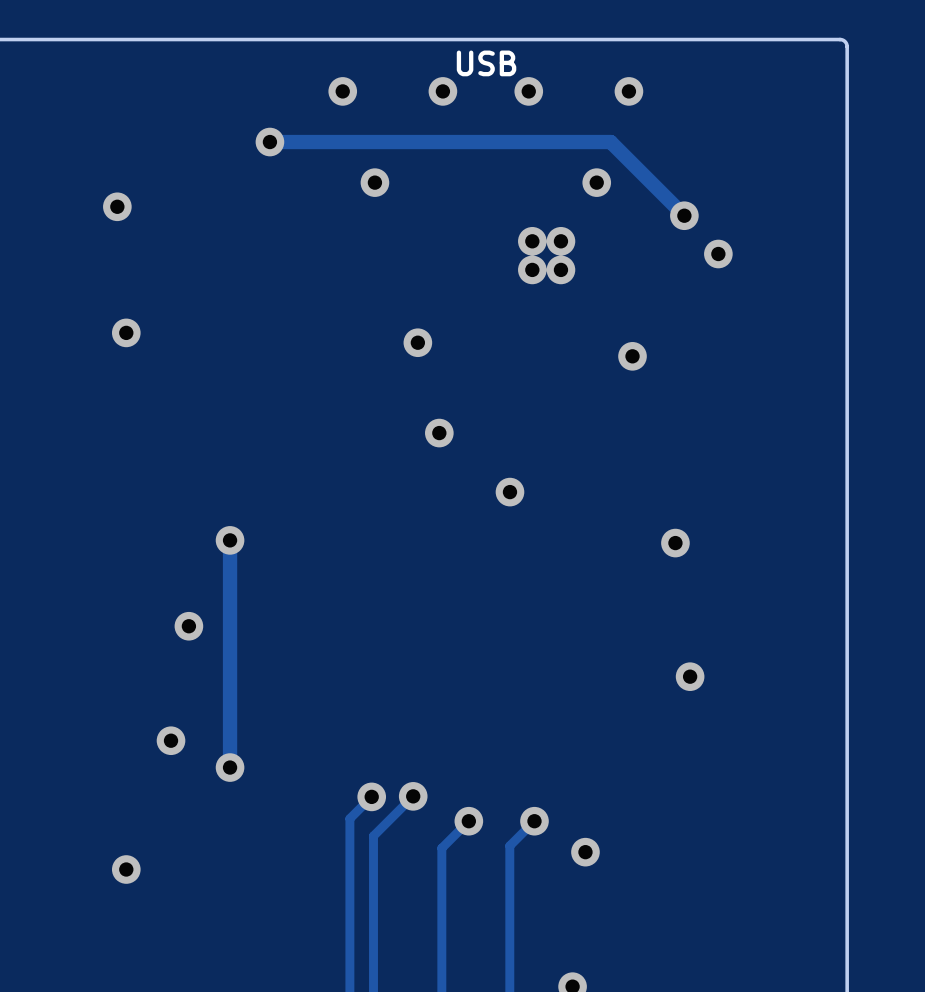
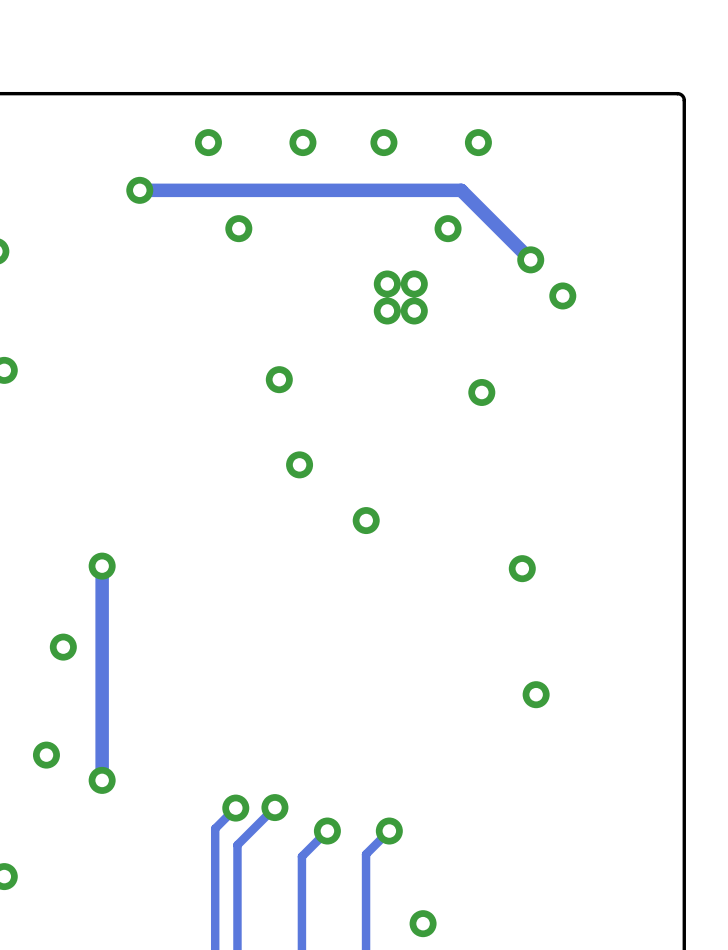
text: USB (486, 63) -> none
via position: (585, 852) -> (423, 923)

